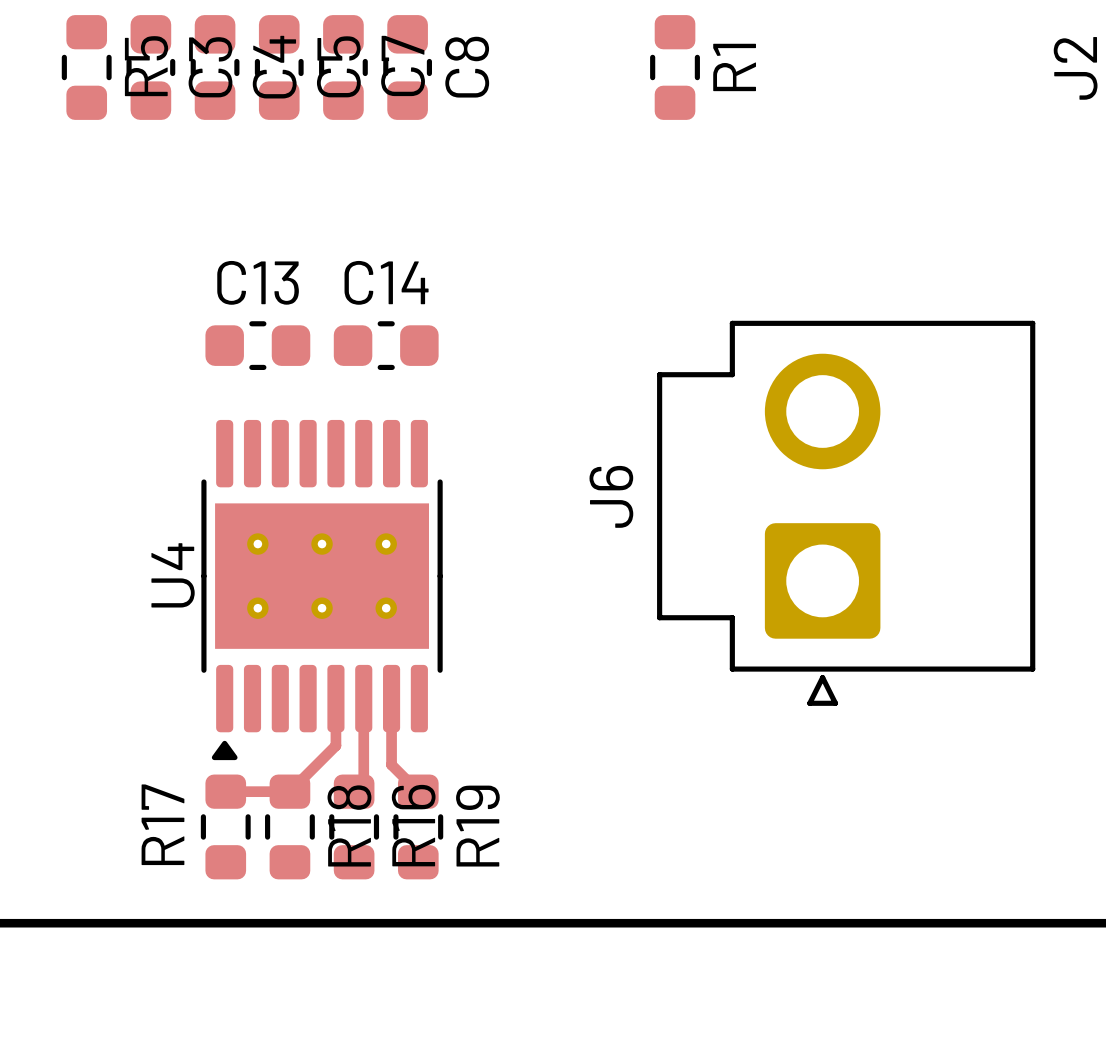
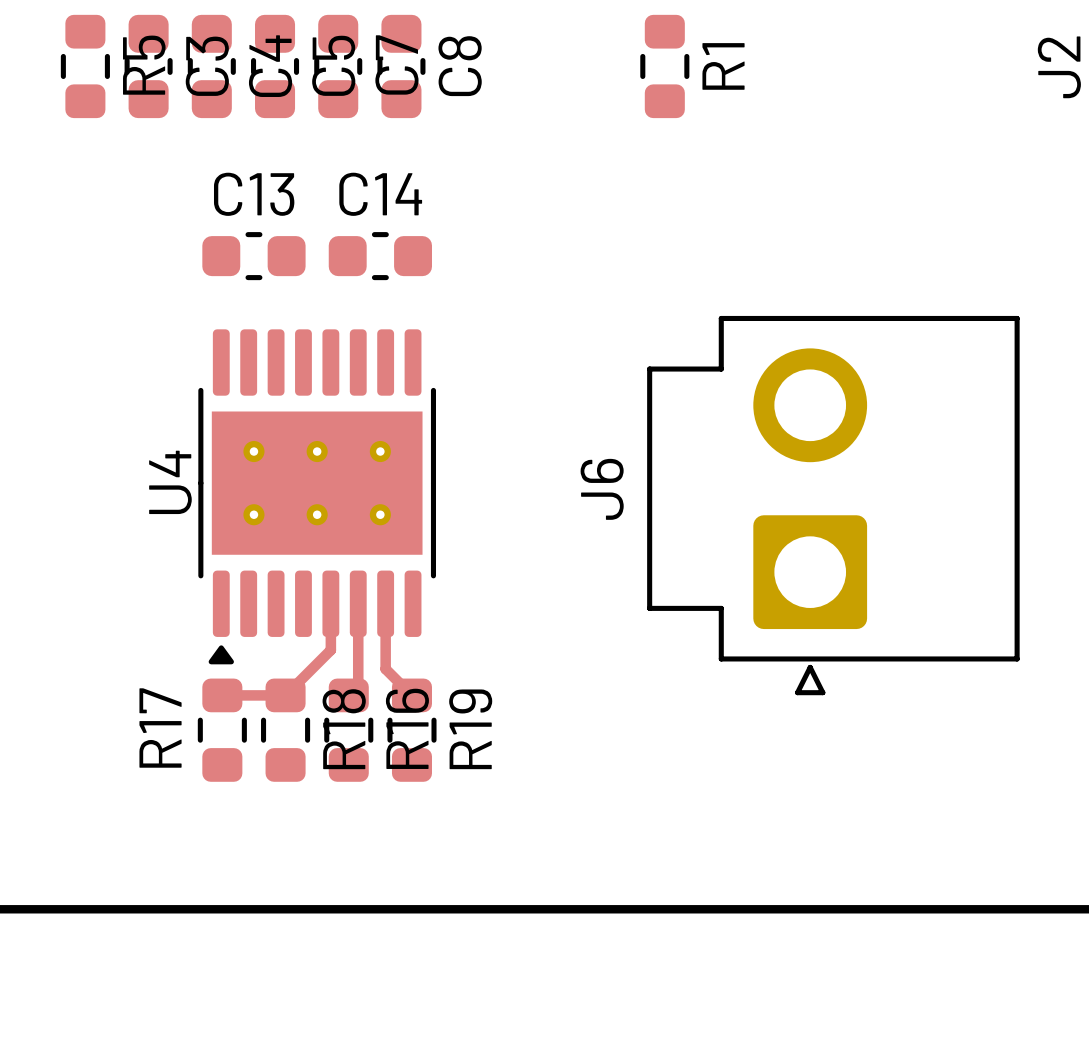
C13 position: (257, 345) -> (253, 256)
C14 position: (386, 345) -> (380, 256)
U4 position: (322, 590) -> (317, 496)
track: (335, 698) (335, 745) (289, 791) (225, 791) -> (330, 603) (330, 650) (285, 695) (222, 695)
track: (363, 698) (363, 782) (354, 791) -> (358, 603) (358, 685) (348, 695)
track: (391, 698) (391, 764) (418, 791) -> (385, 603) (385, 669) (411, 695)
R17 position: (225, 826) -> (222, 730)
R18 position: (289, 826) -> (285, 730)
R16 position: (354, 826) -> (348, 730)
R19 position: (418, 826) -> (411, 730)

